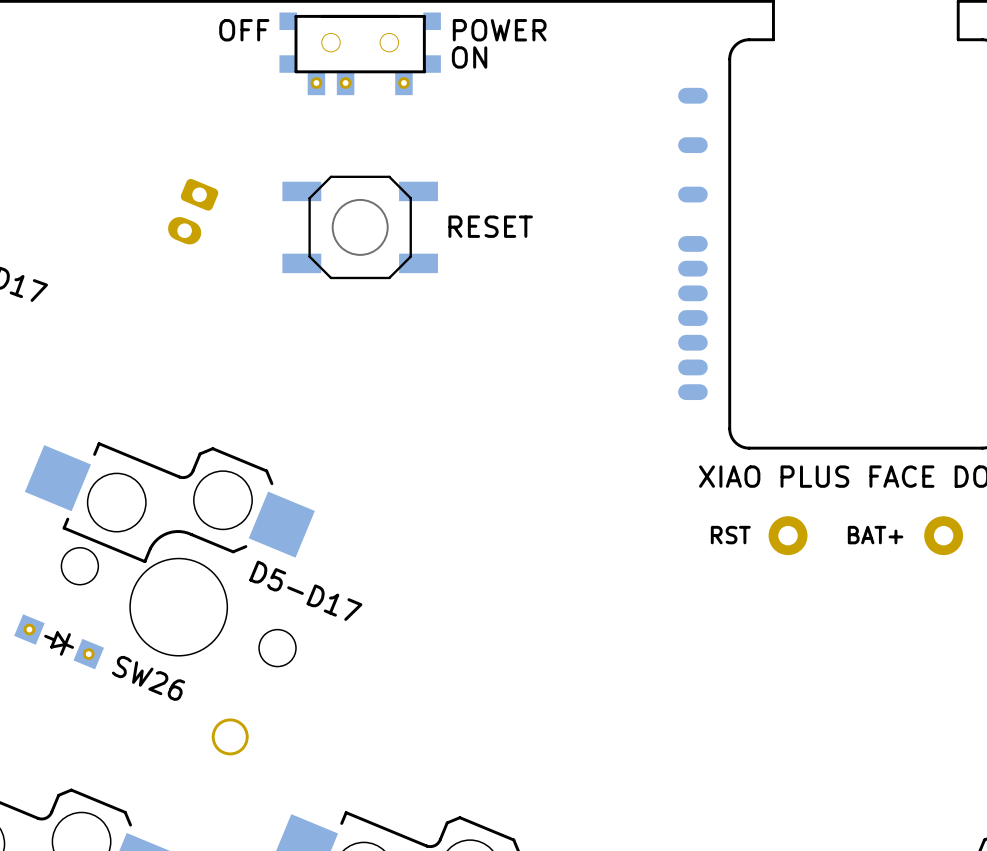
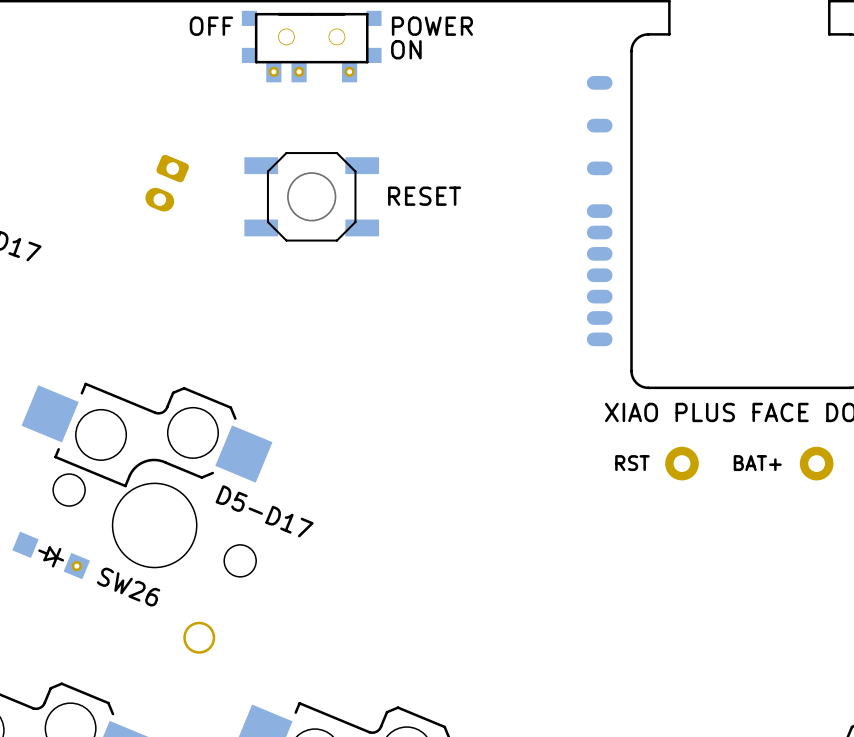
part footprint: [14, 614, 104, 670] -> [12, 531, 90, 580]

